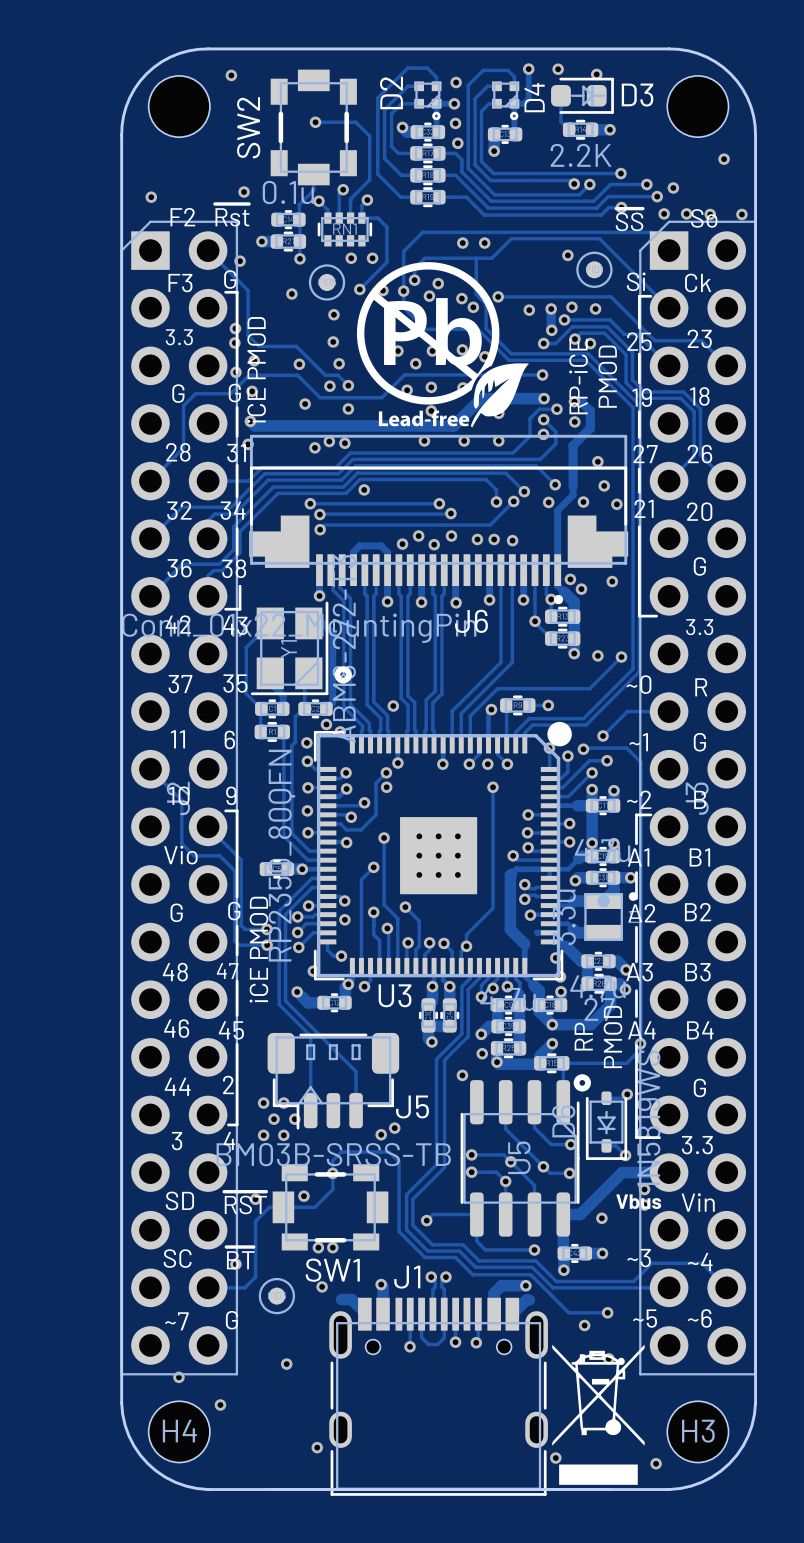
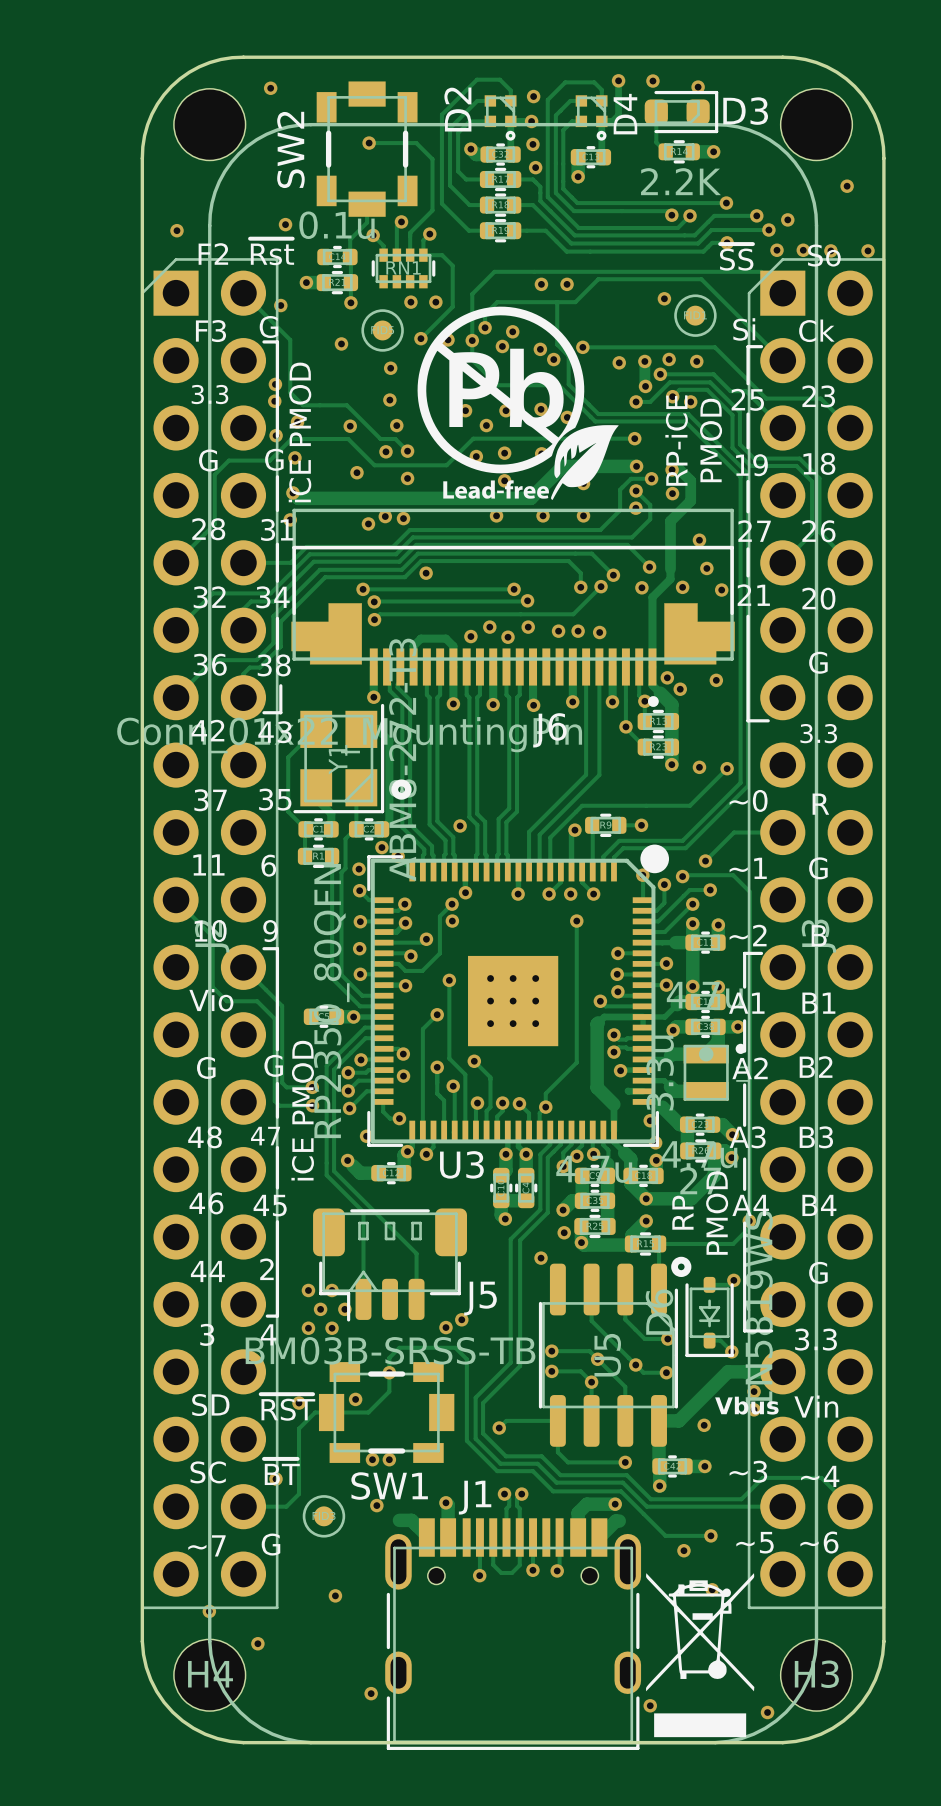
D3 footprint: [551, 77, 614, 114] -> [644, 90, 719, 134]
D2 footprint: [414, 81, 442, 121] -> [484, 95, 517, 141]
D4 footprint: [492, 81, 520, 121] -> [575, 95, 608, 141]
line: none -> (310, 1742) (297, 1741) (272, 1734) (260, 1728) (240, 1712) (231, 1702) (218, 1679) (213, 1667) (209, 1641) (210, 214) (219, 181) (238, 153) (266, 134) (288, 126) (310, 124) (726, 125) (759, 134) (787, 153) (801, 171) (814, 203) (816, 225) (816, 1641) (812, 1667) (808, 1679) (802, 1691) (786, 1712) (765, 1728) (753, 1734) (741, 1738) (715, 1742)

